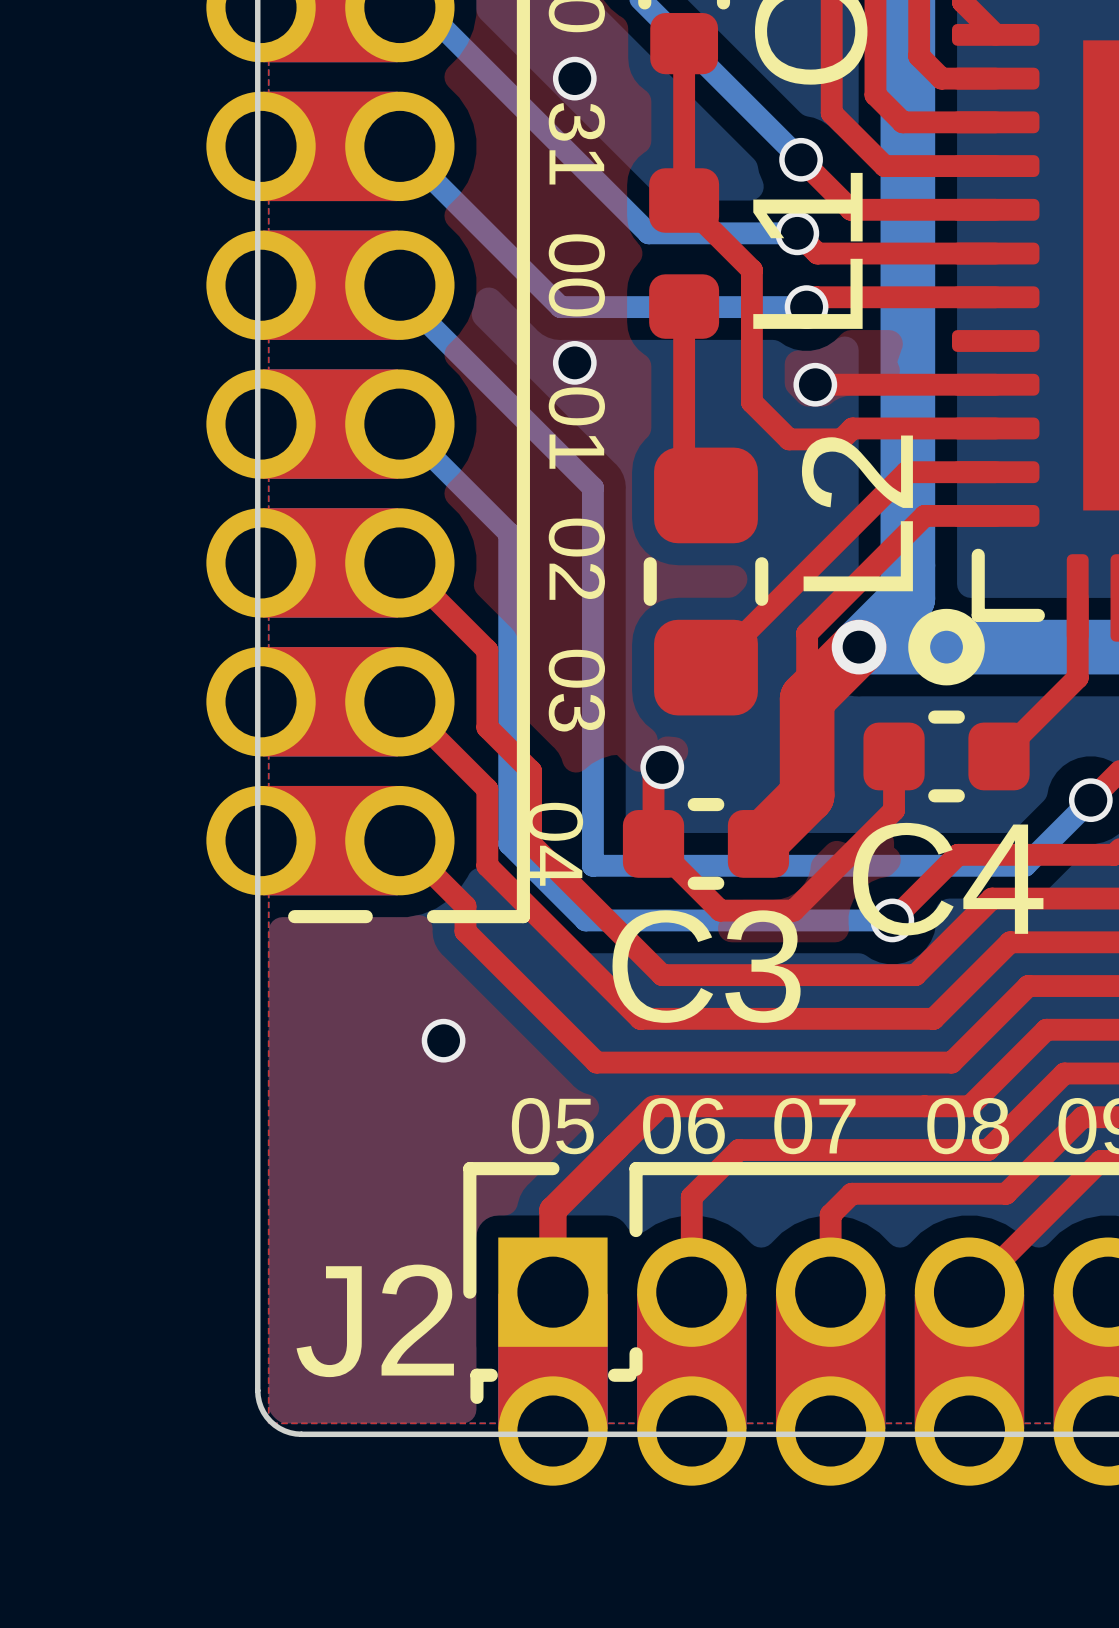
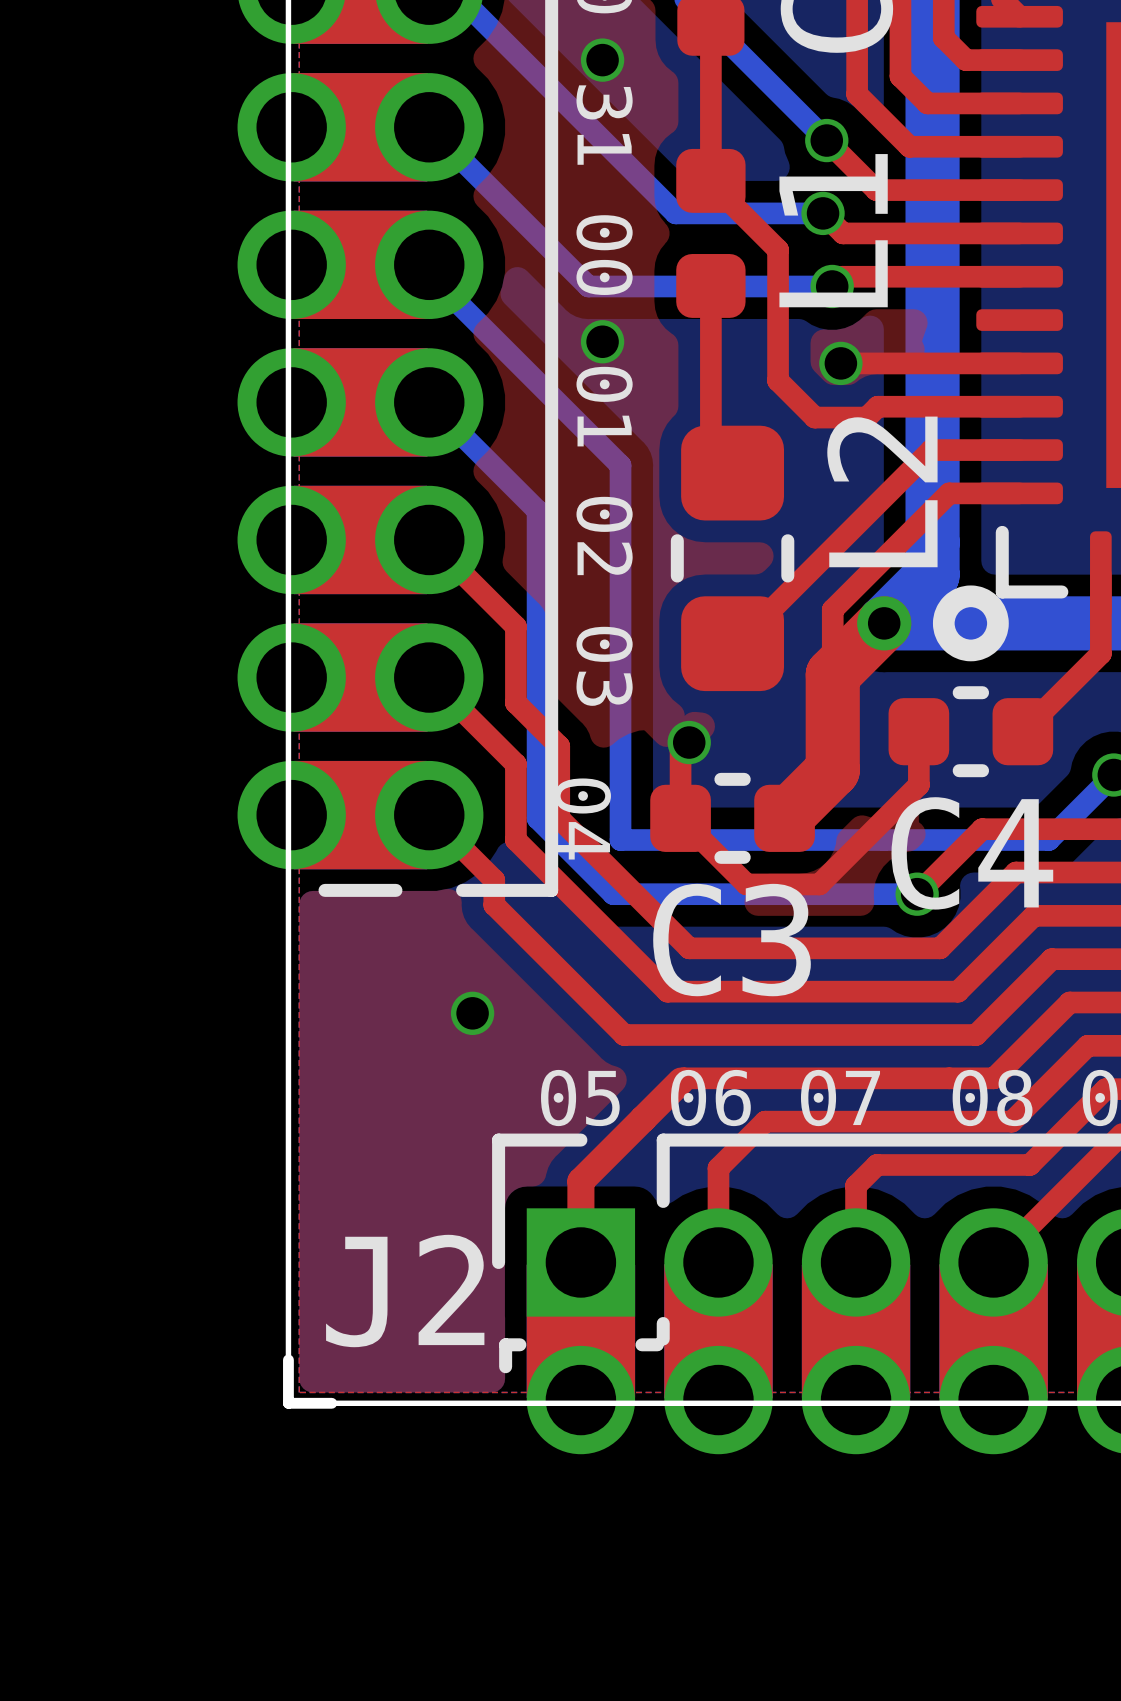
board edge: (257, 1390) (261, 1407) (270, 1421) (284, 1430) (301, 1434) -> (288, 1359) (288, 1403) (331, 1403)

